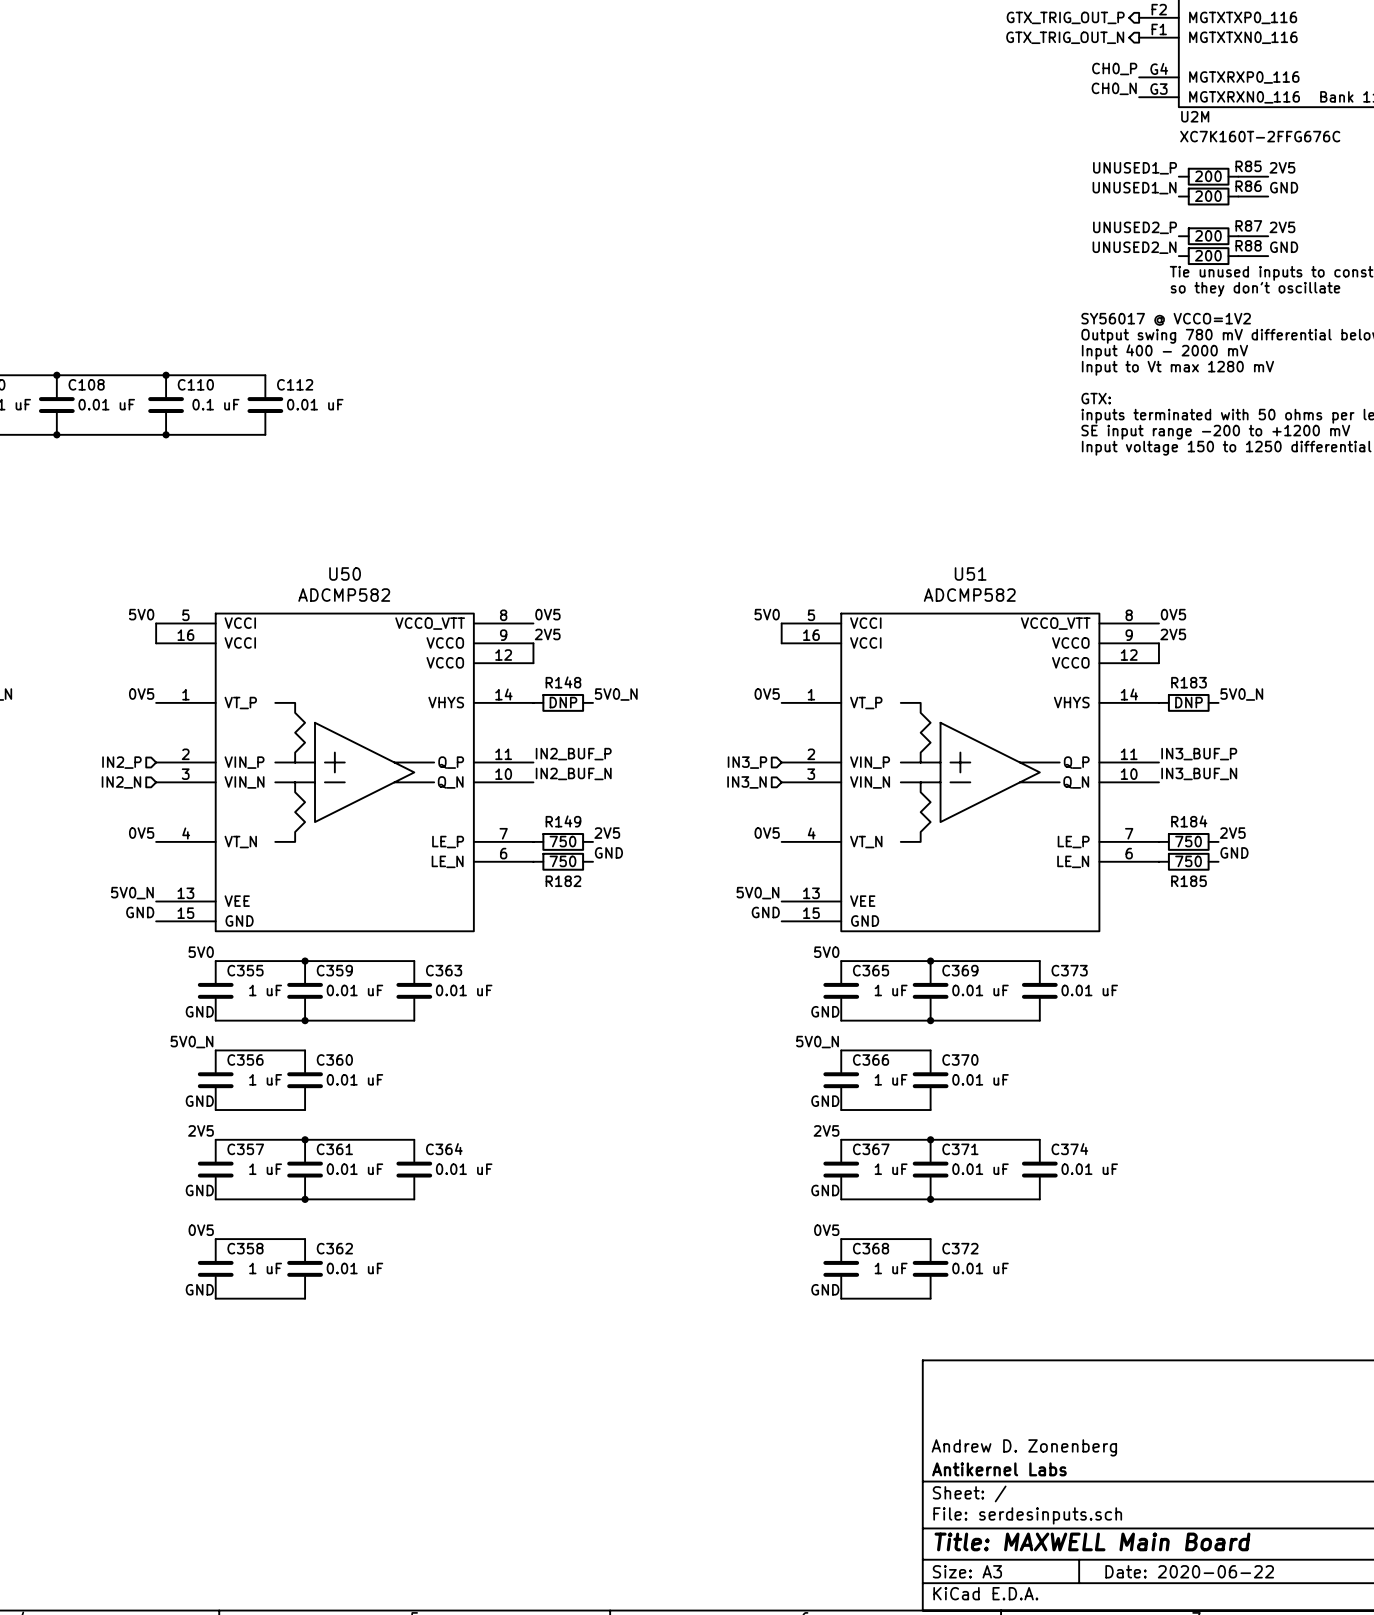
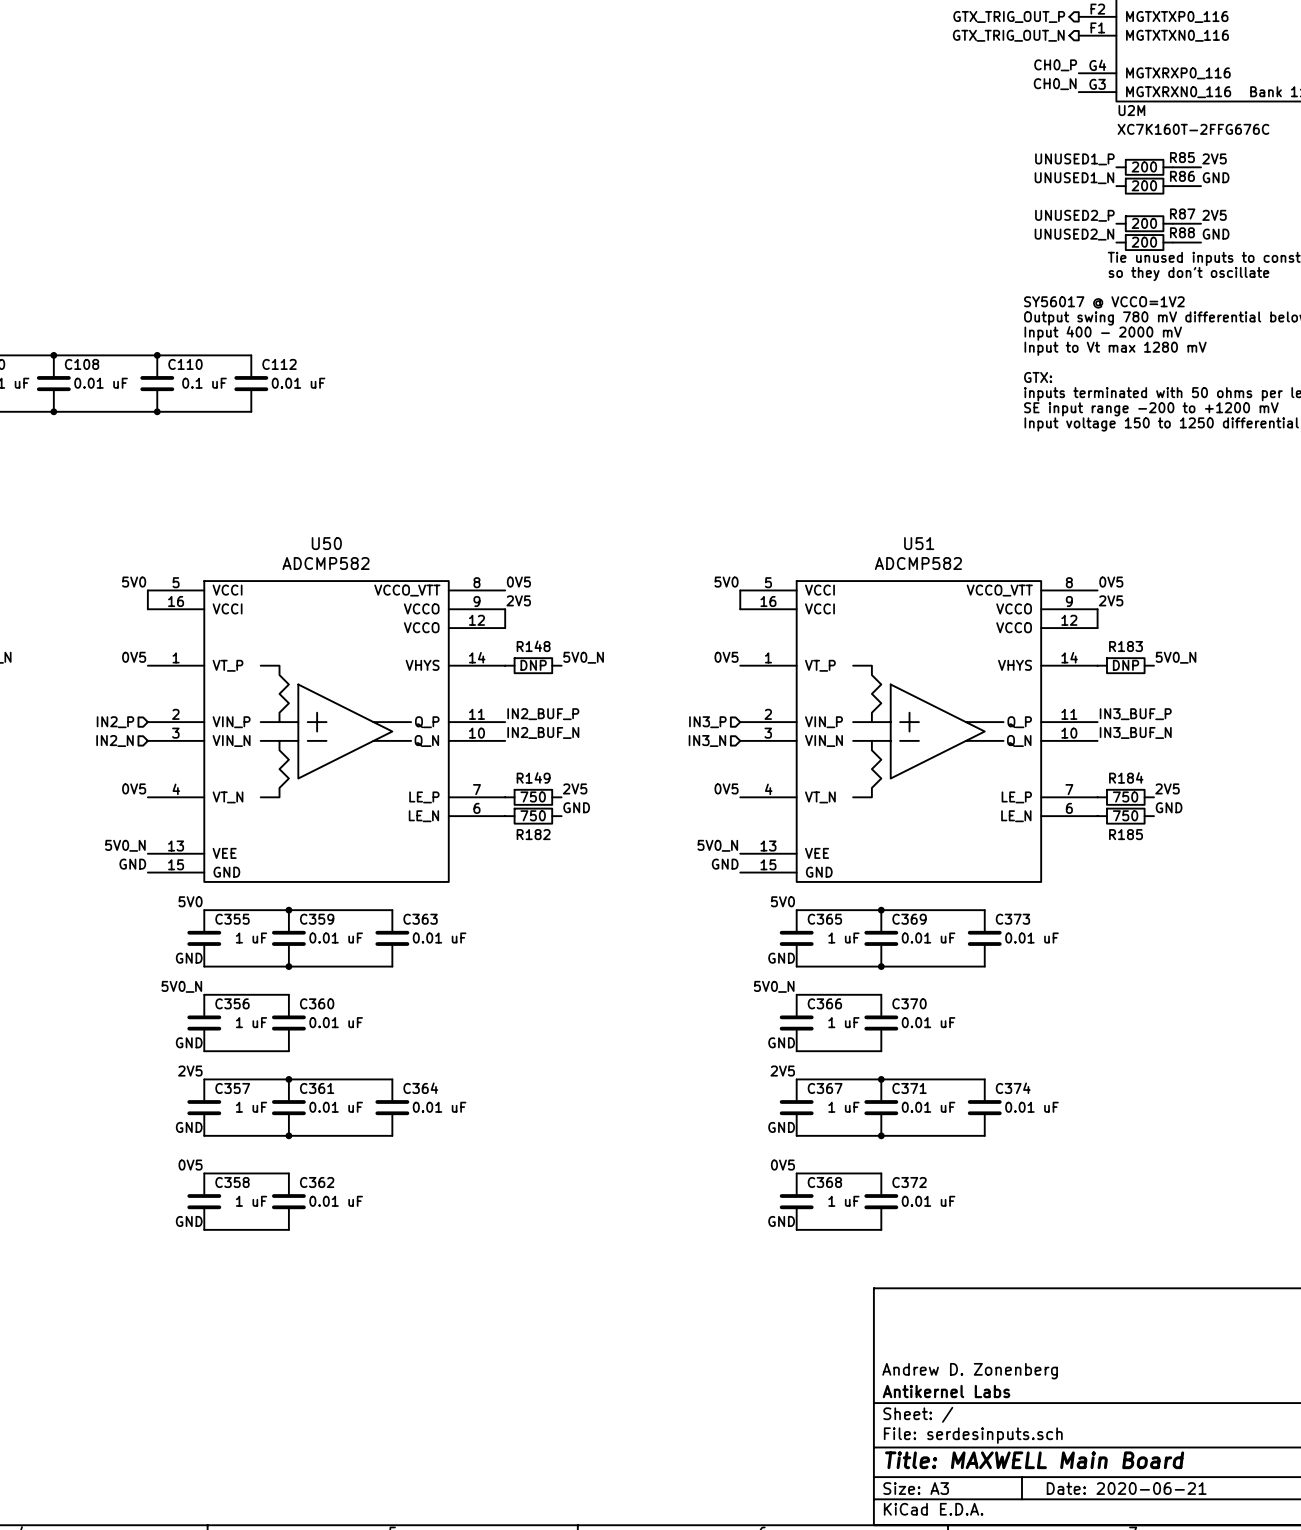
title block: Date: 2020-06-22 (1189, 1571) -> Date: 2020-06-21 (1126, 1488)

